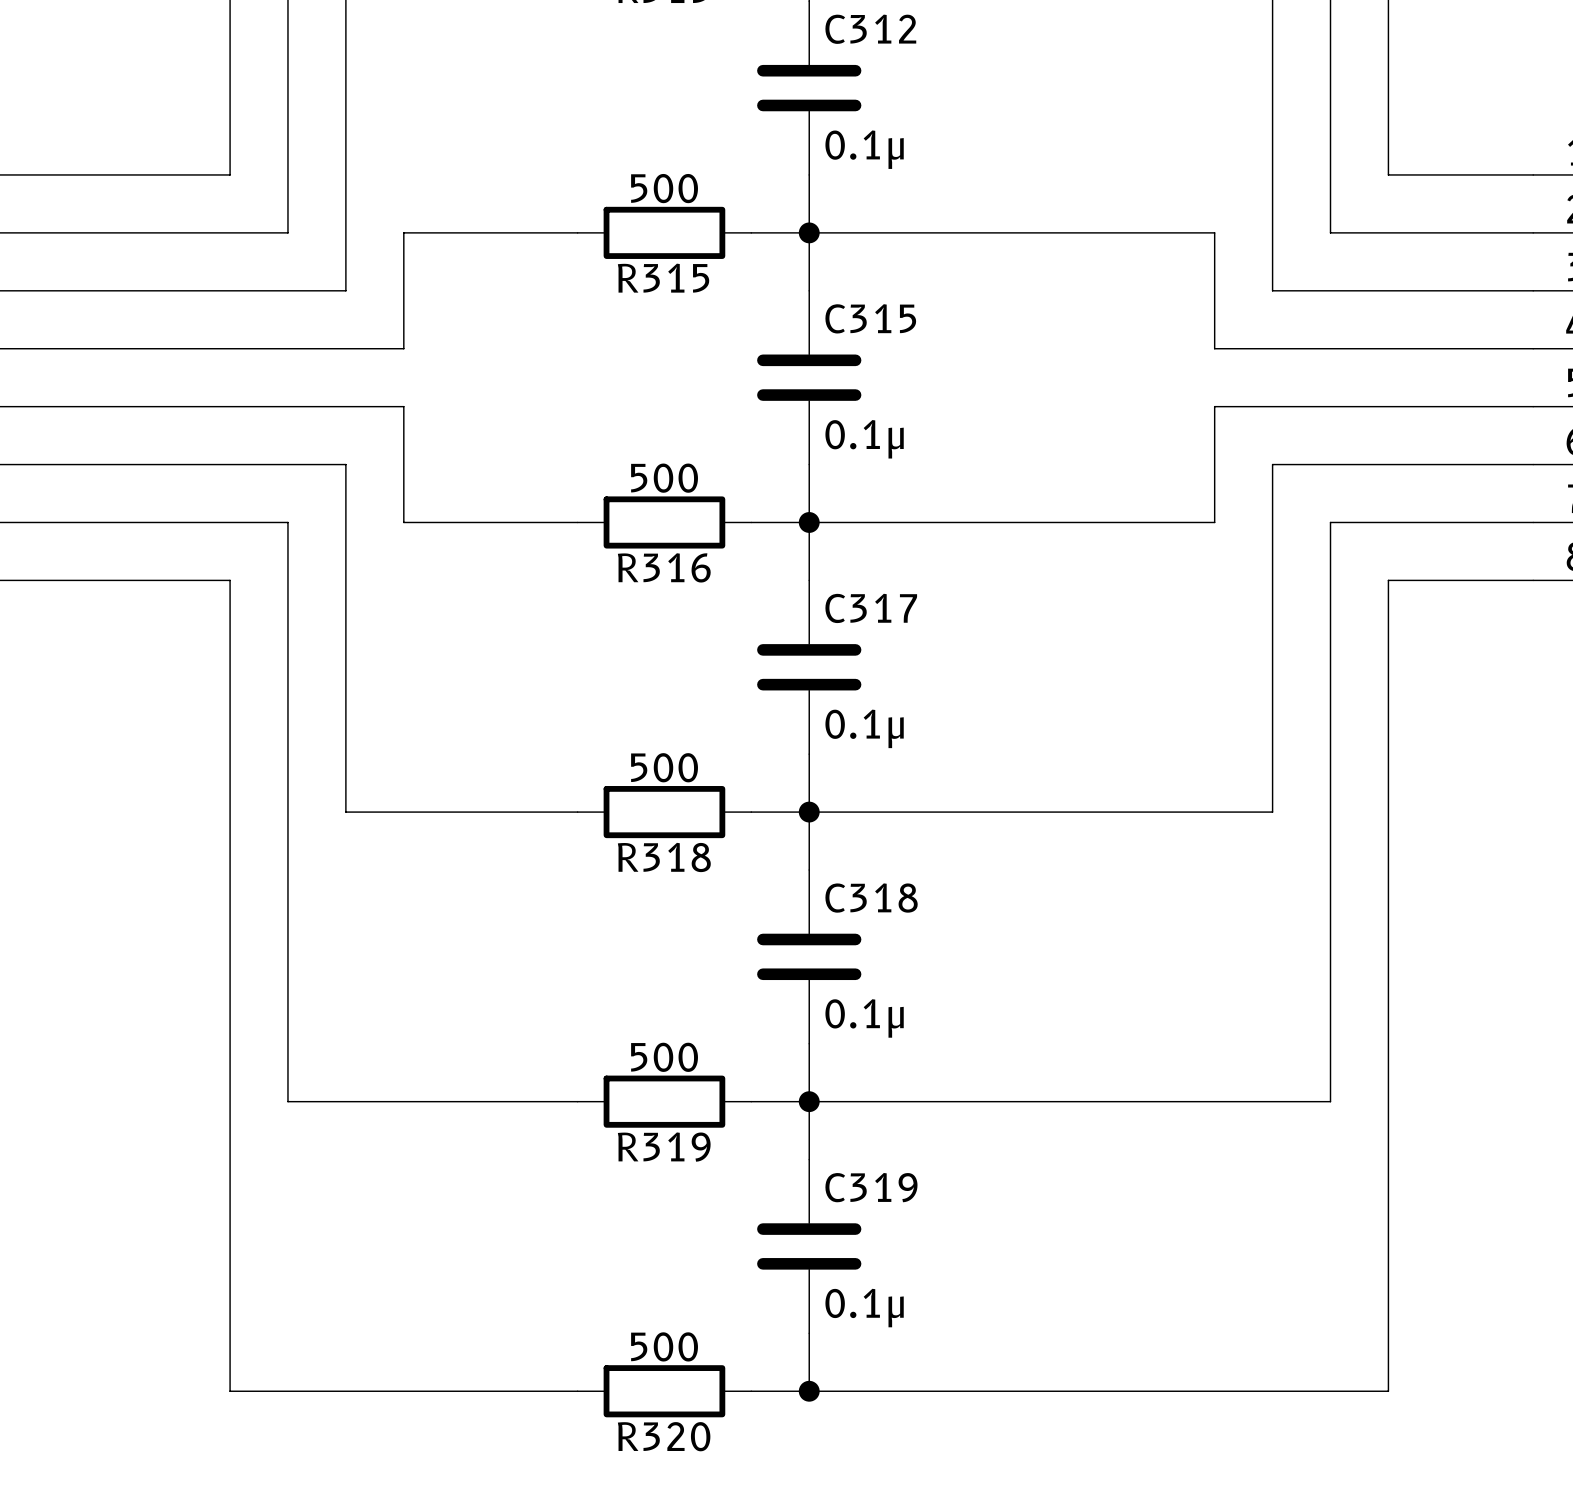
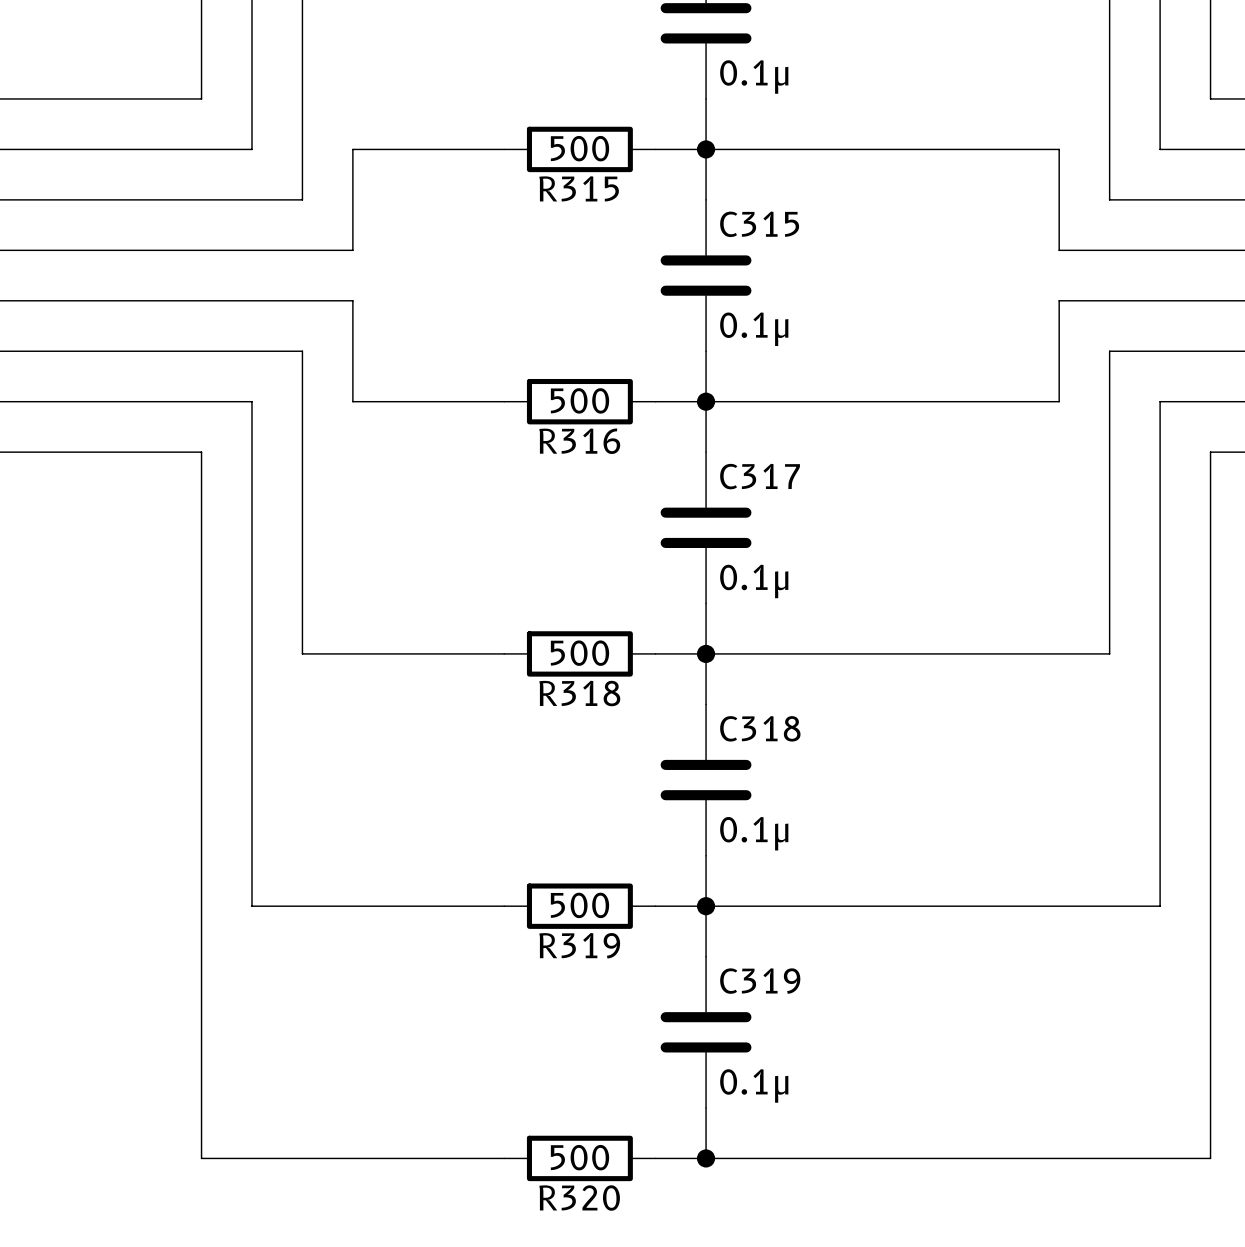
R315 value position: 500 (664, 188) -> 500 (579, 148)
R316 value position: 500 (664, 478) -> 500 (579, 400)
R318 value position: 500 (664, 767) -> 500 (579, 653)
R319 value position: 500 (664, 1057) -> 500 (579, 905)
R320 value position: 500 (664, 1346) -> 500 (579, 1157)

